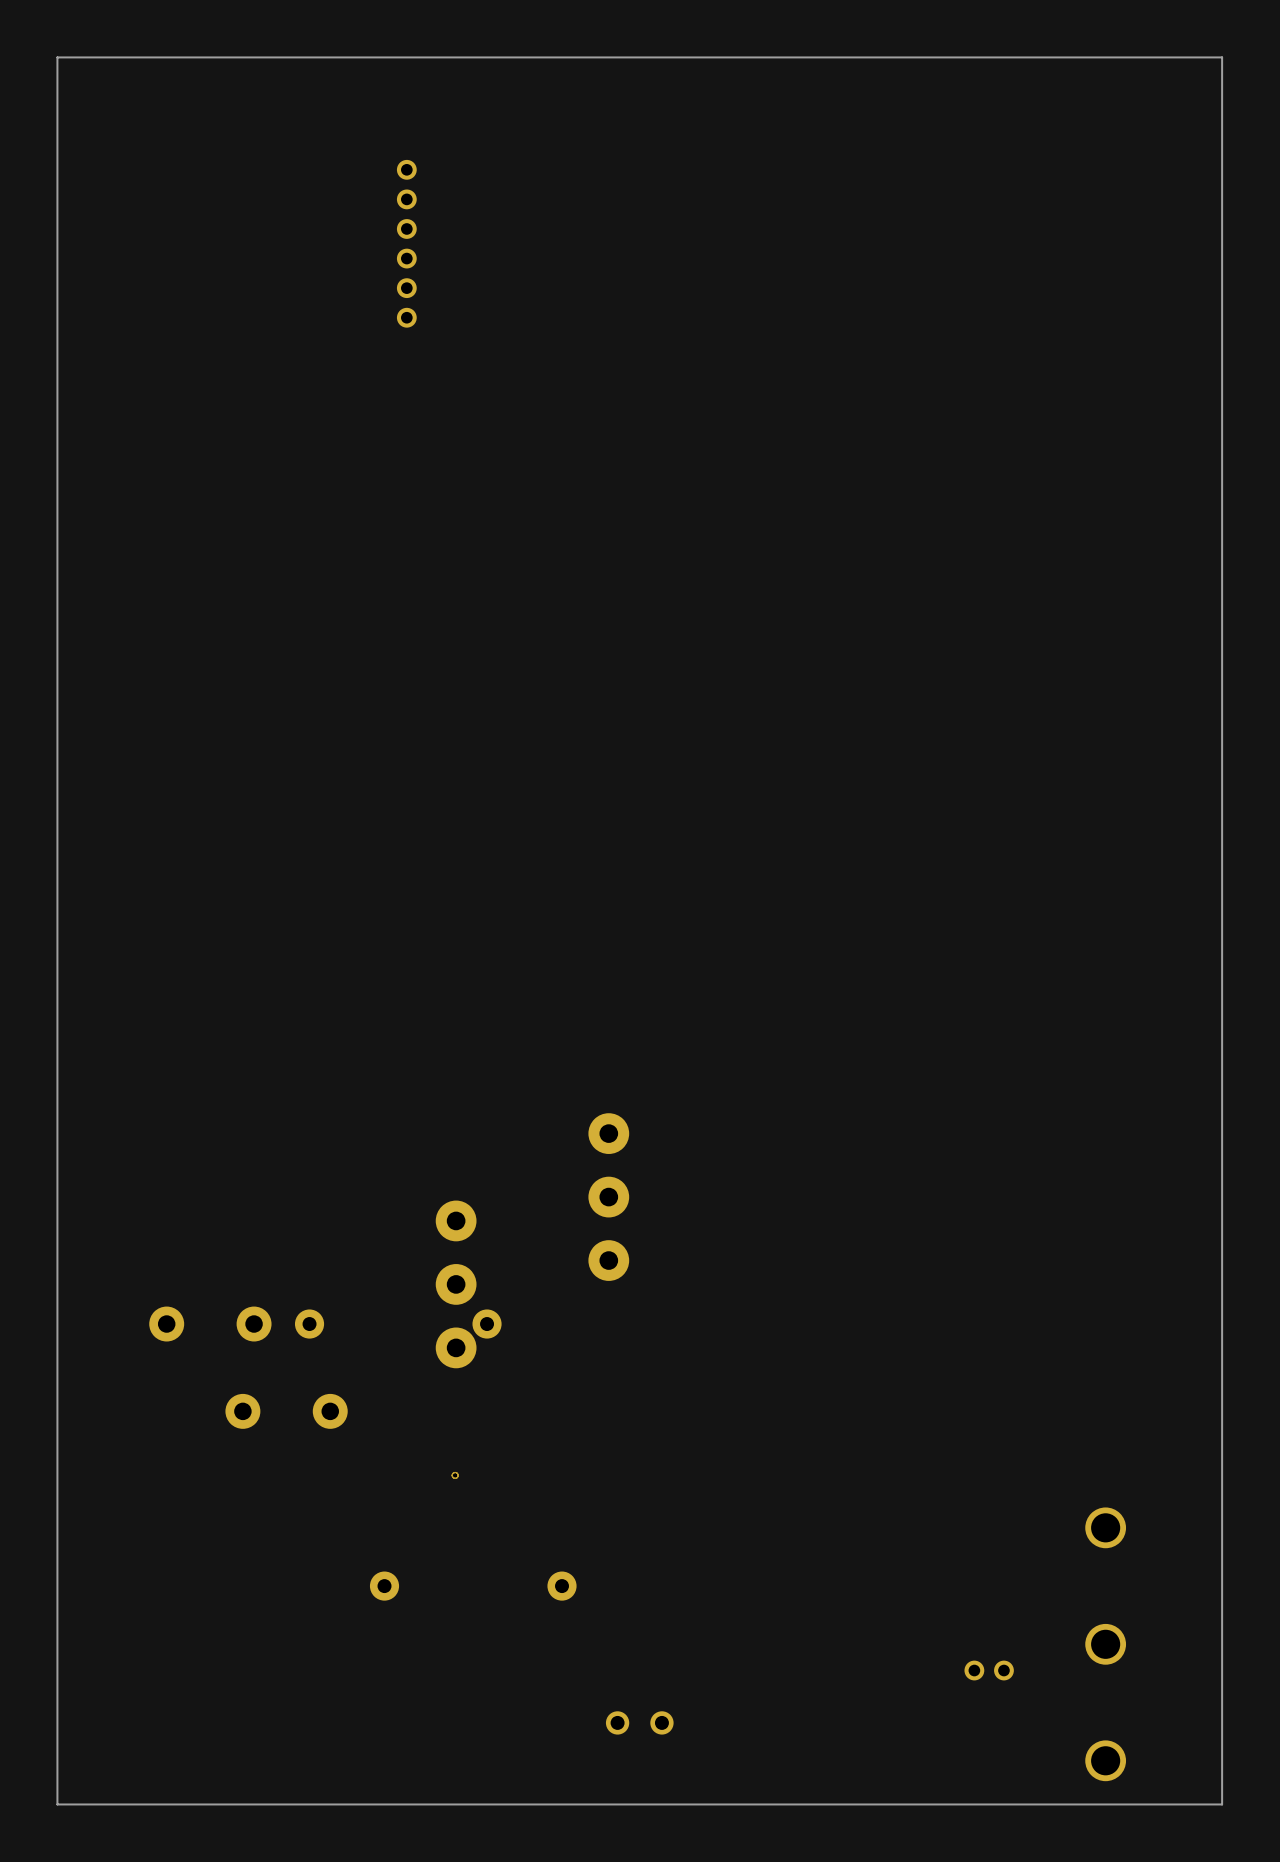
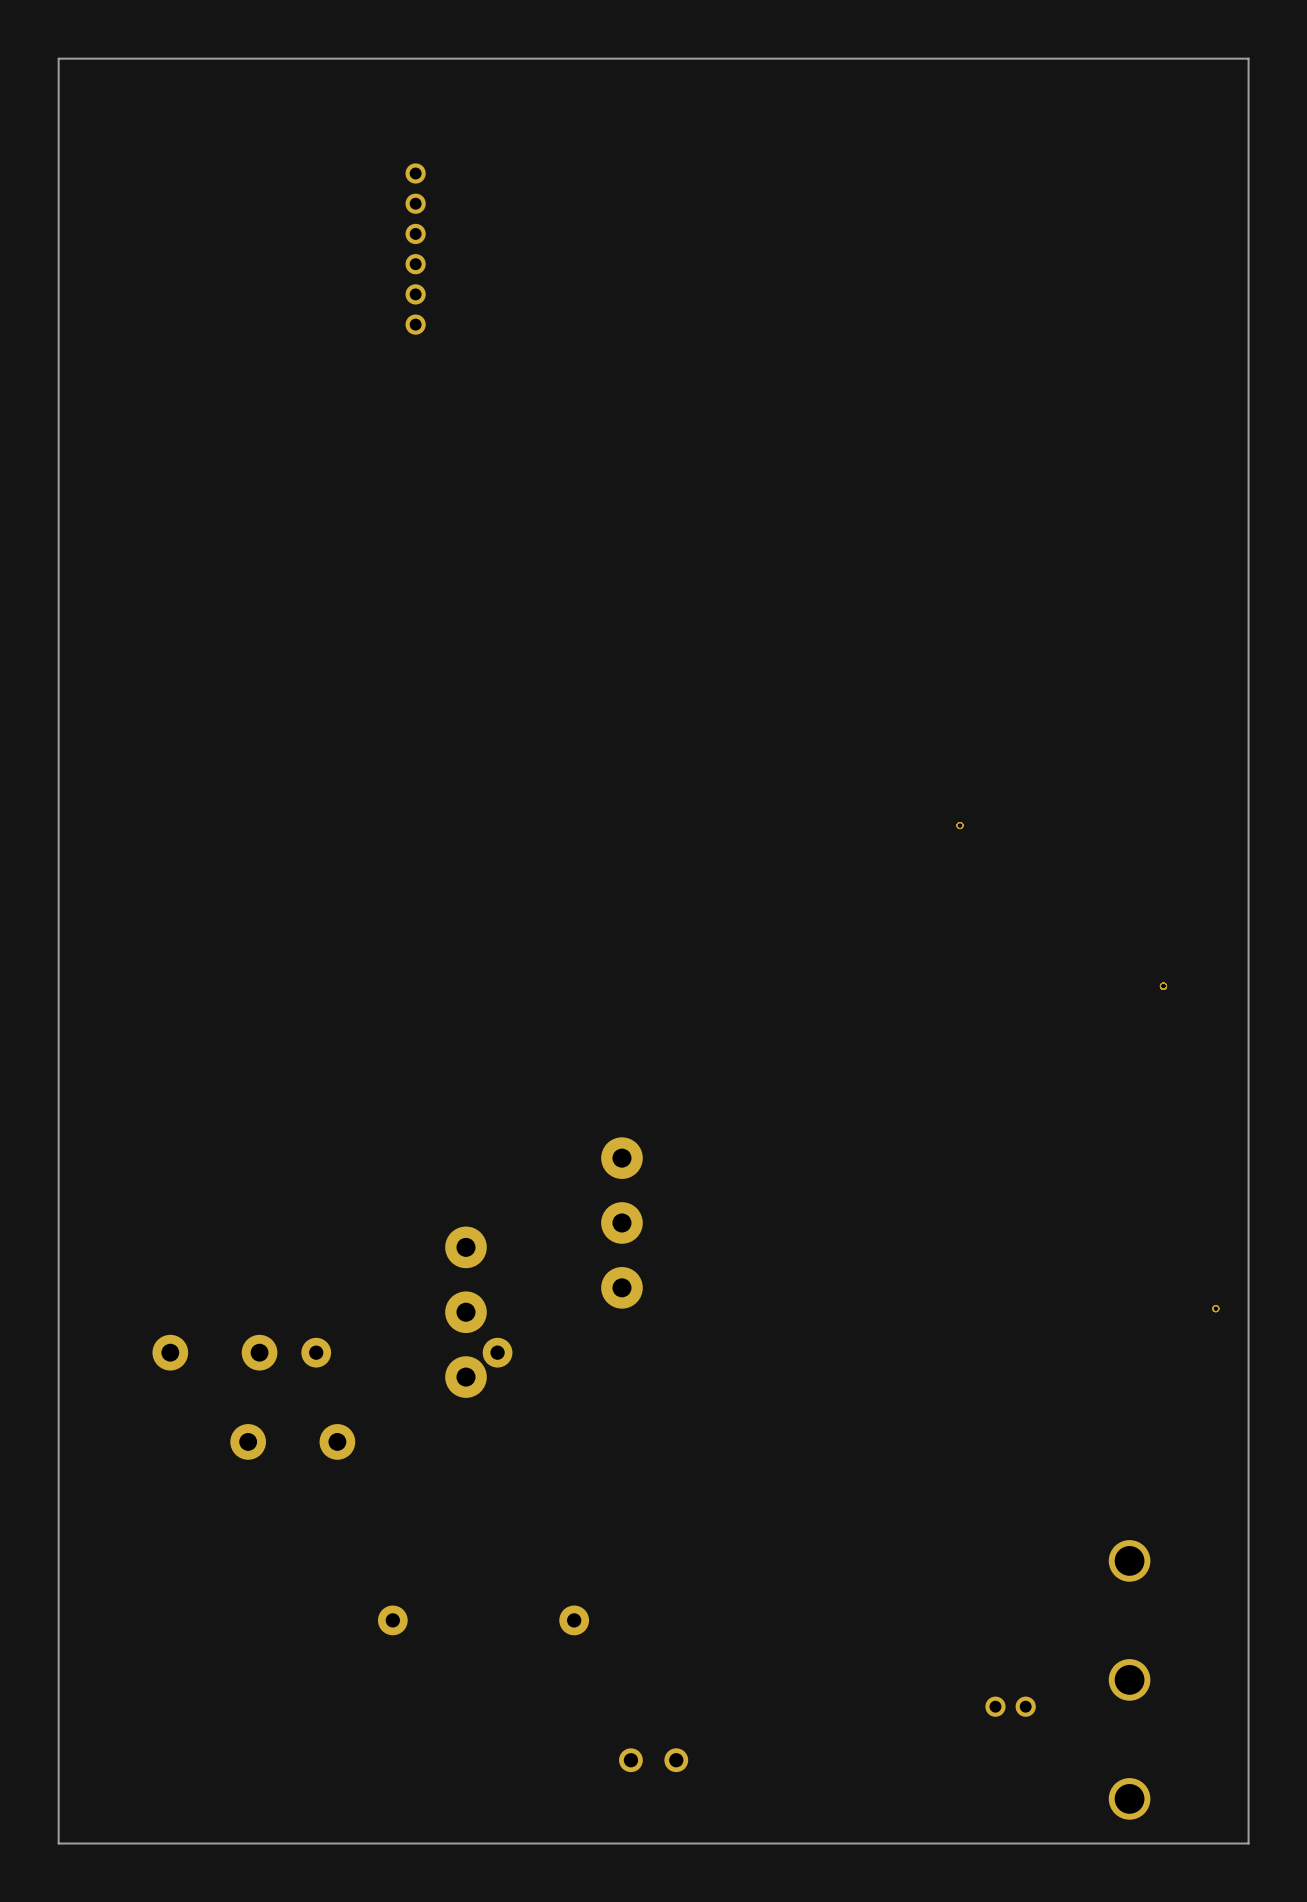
via: none -> (960, 825)
via: none -> (1163, 986)
via: none -> (1215, 1308)
via: (455, 1475) -> none

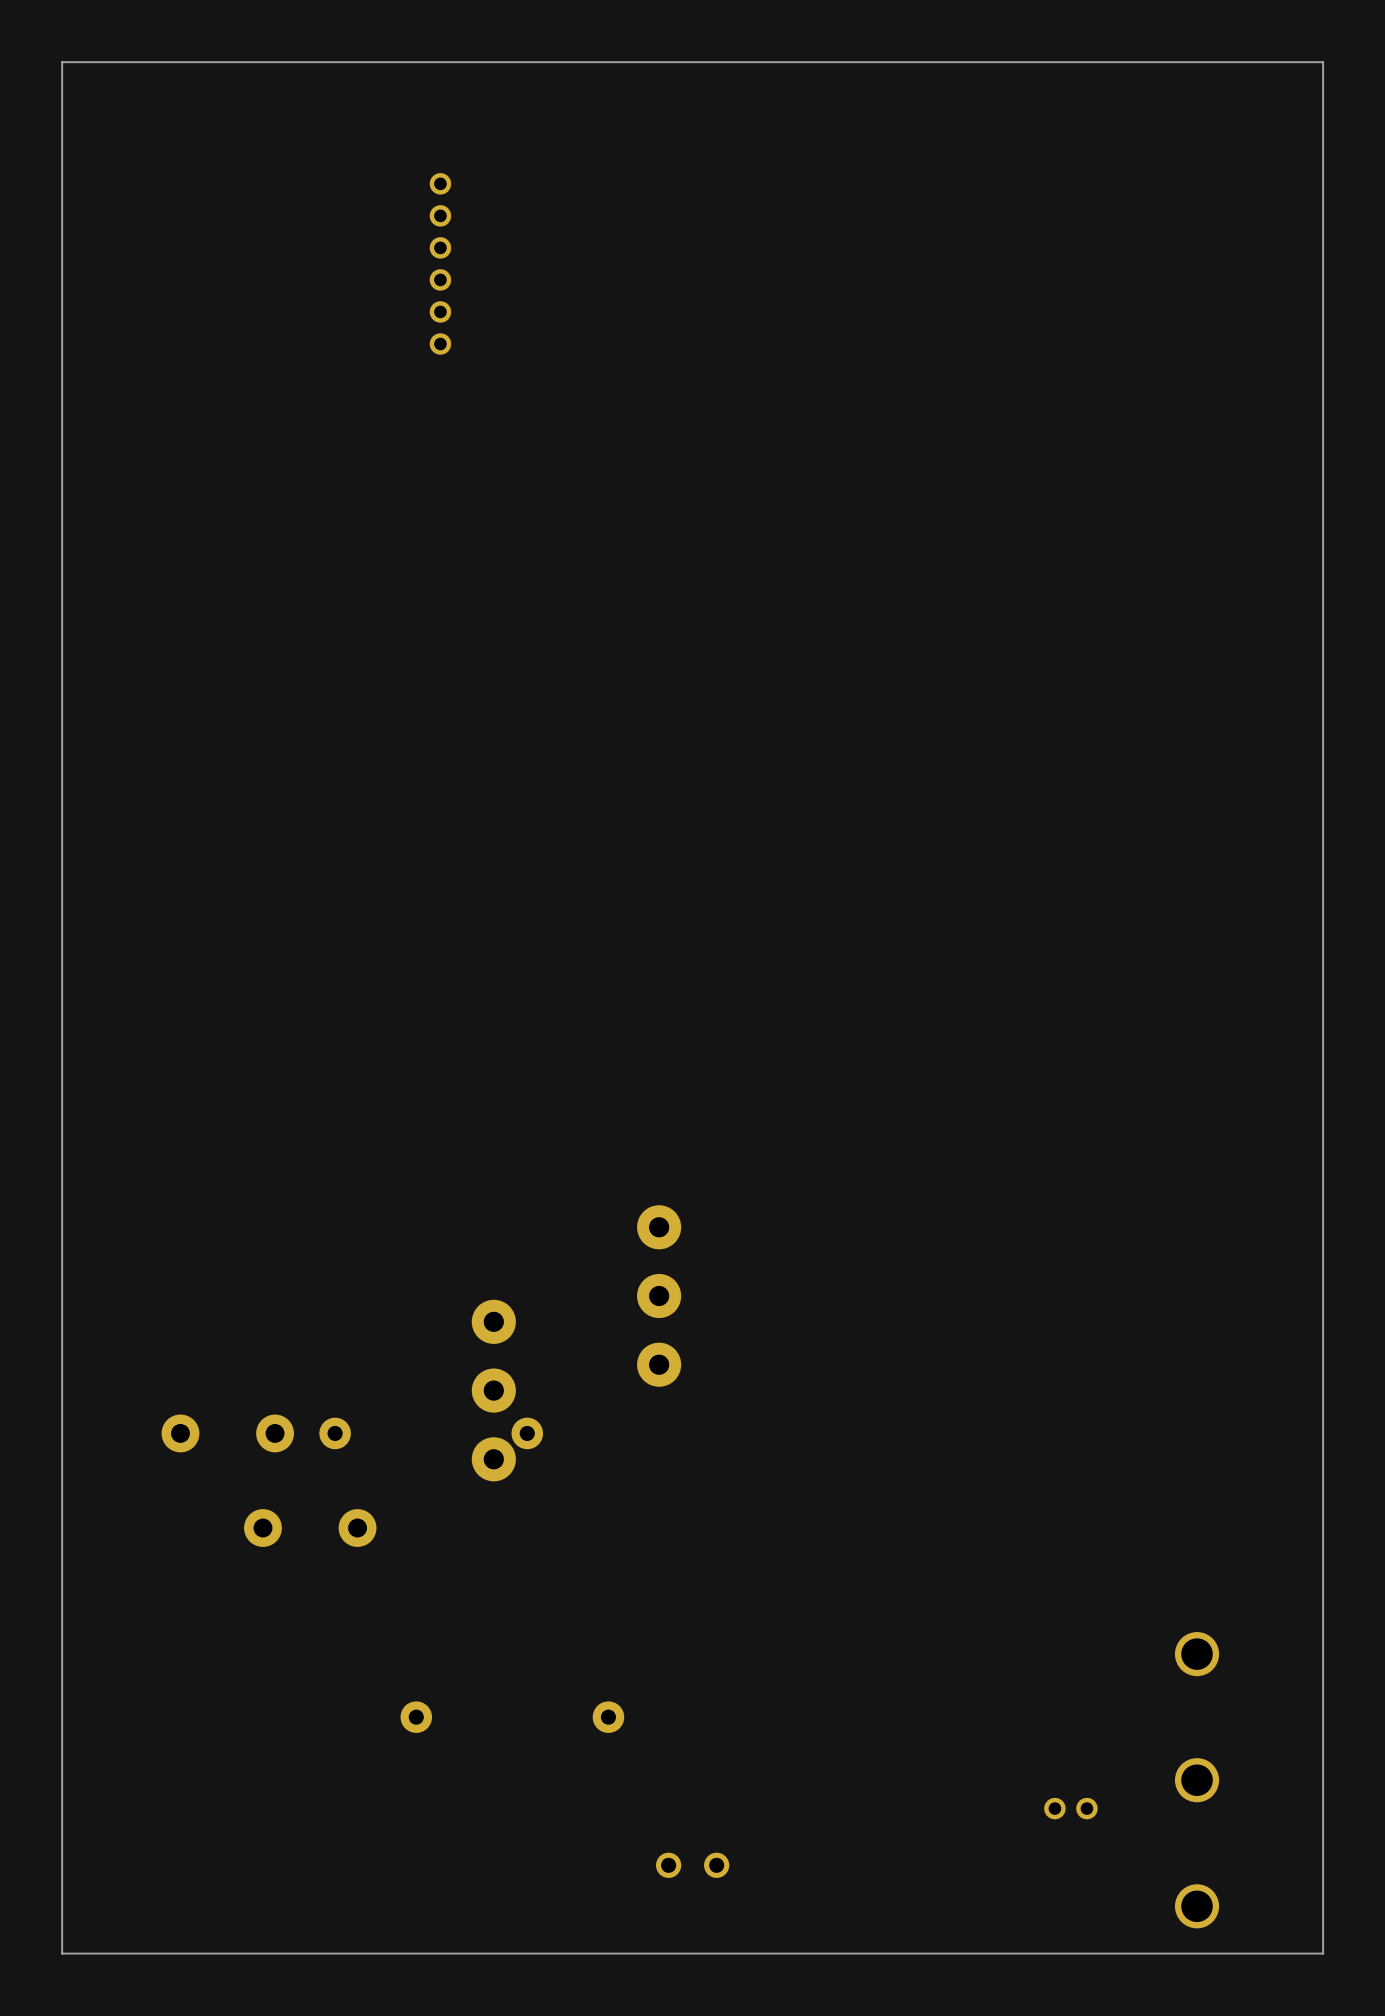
via: (960, 825) -> none
via: (1163, 986) -> none
via: (1215, 1308) -> none

